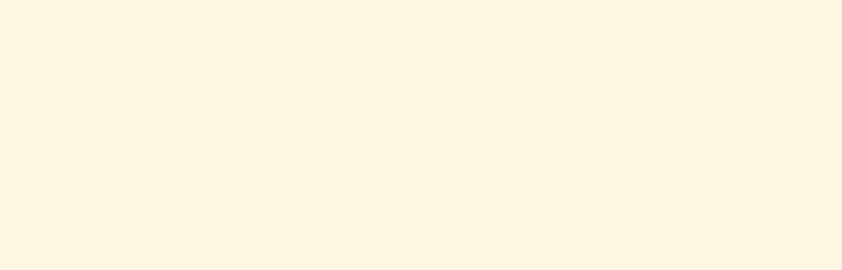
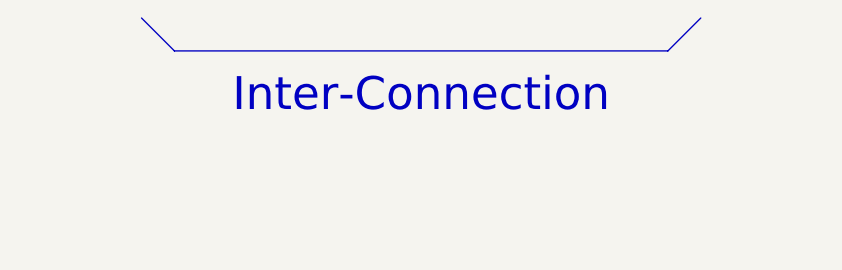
line: none -> (141, 18) (174, 50) (667, 50) (700, 18)
text: none -> Inter-Connection (421, 92)

